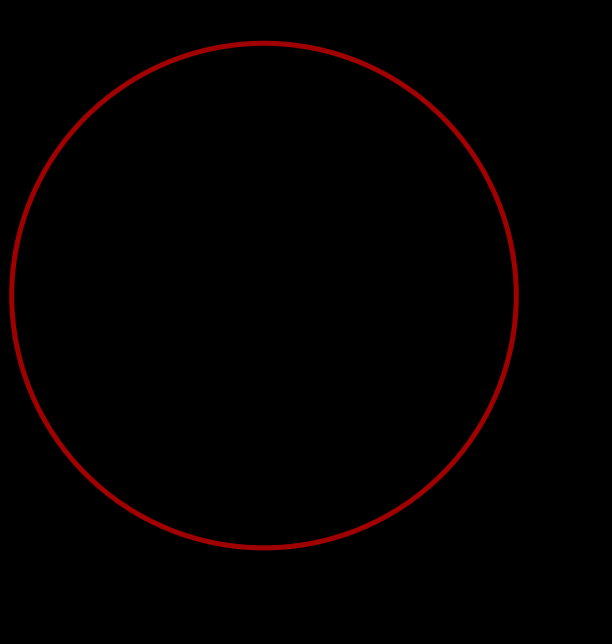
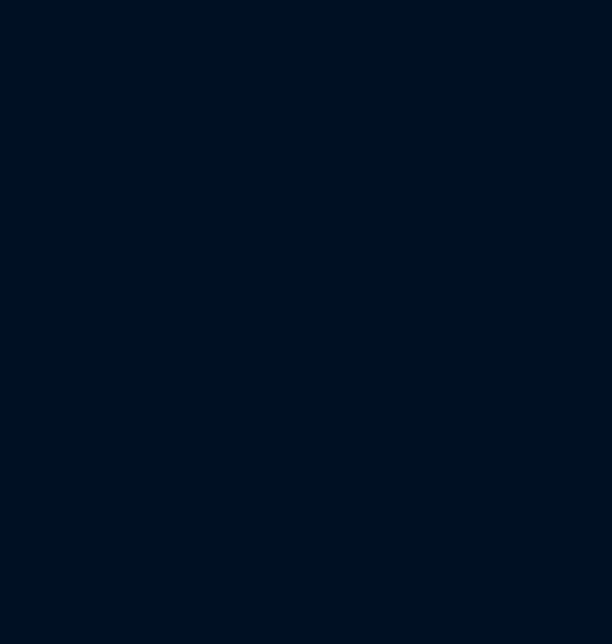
drawing: [9, 40, 519, 551] -> none

